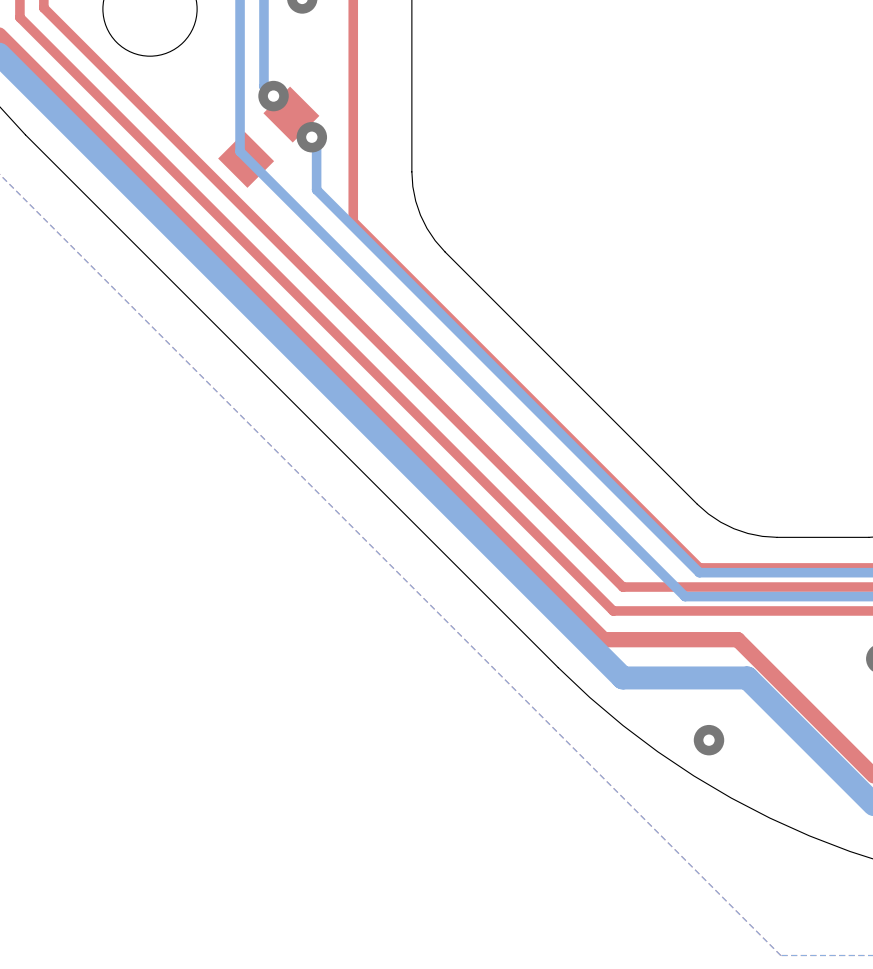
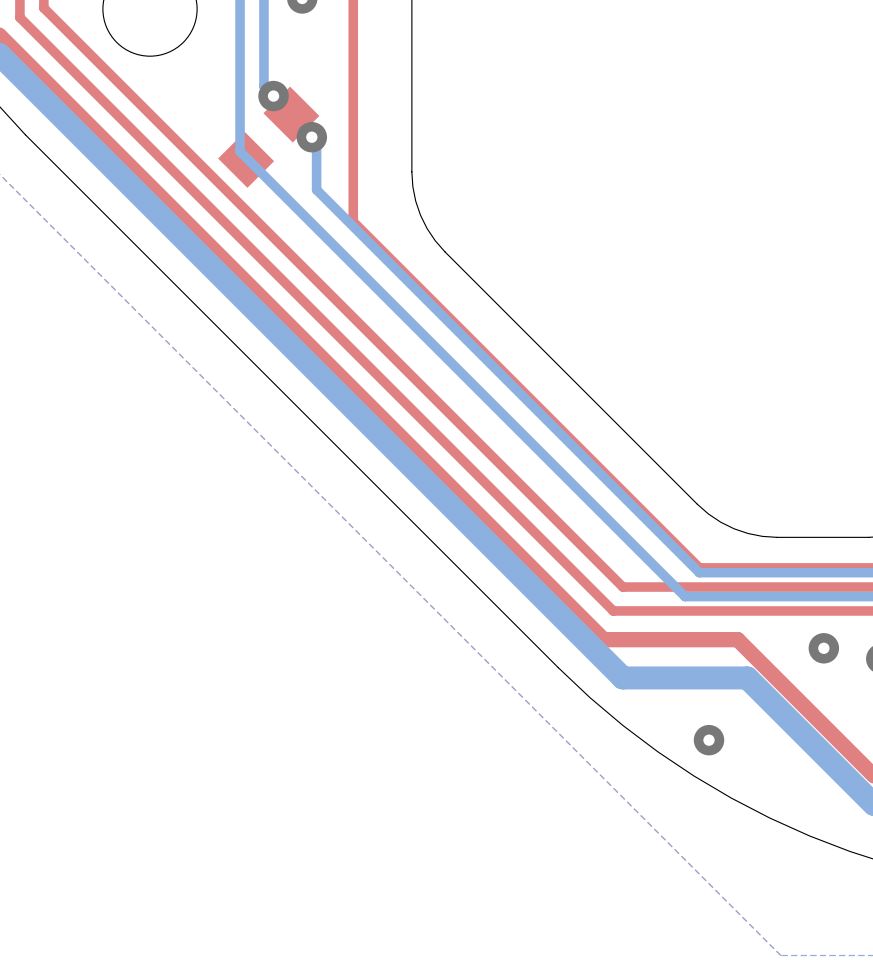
via: none -> (823, 648)

